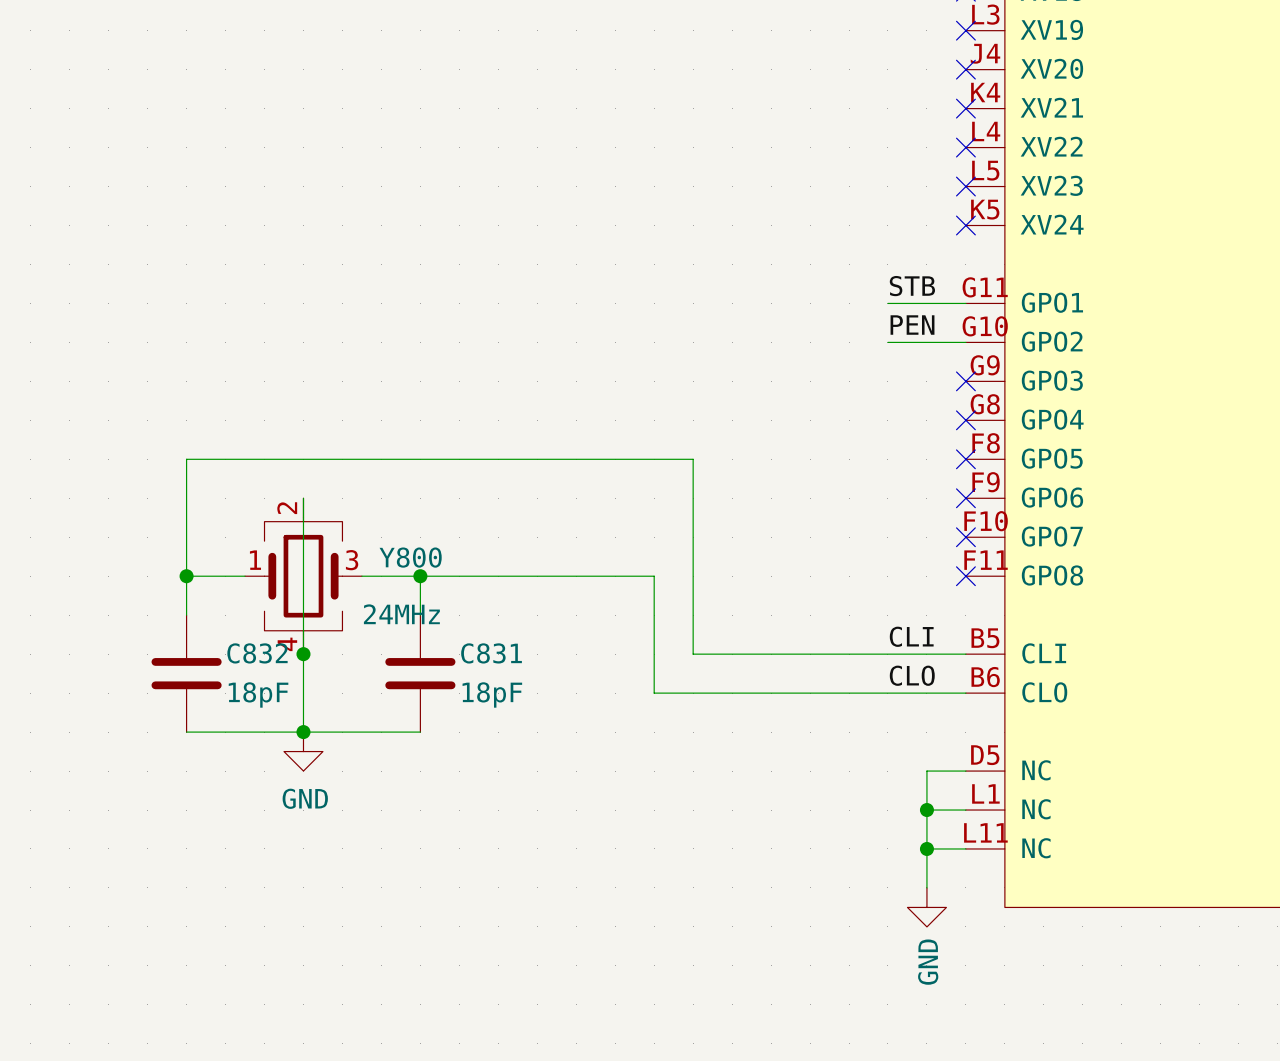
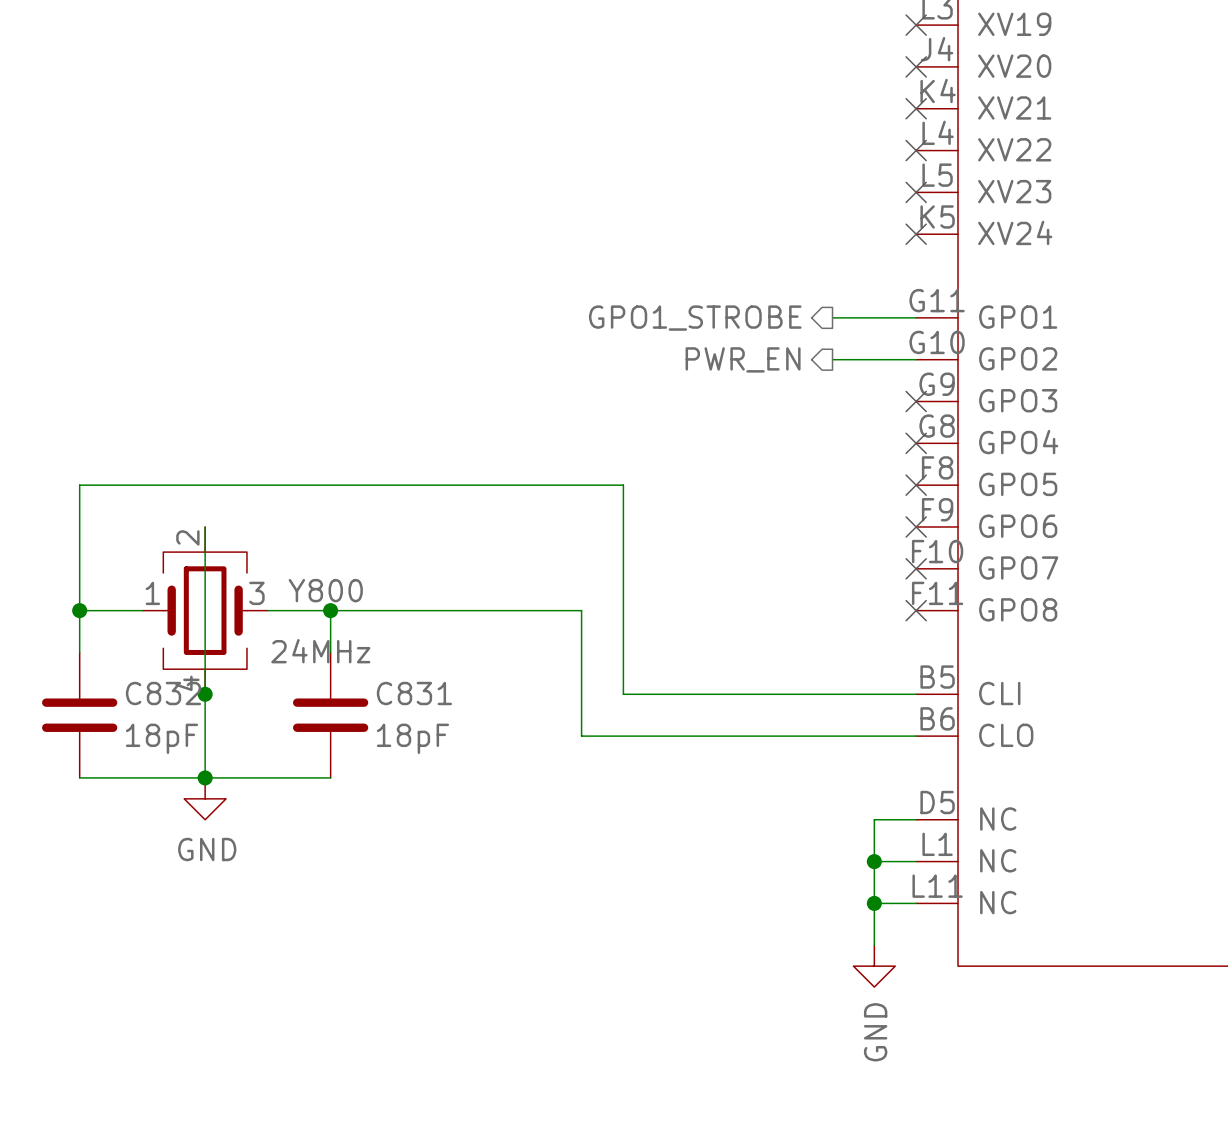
label: STB (912, 286) -> none
hierarchical label: none -> GPO1_STROBE (695, 318)
label: PEN (912, 325) -> none
hierarchical label: none -> PWR_EN (743, 359)
label: CLI (911, 636) -> none
label: CLO (912, 675) -> none

